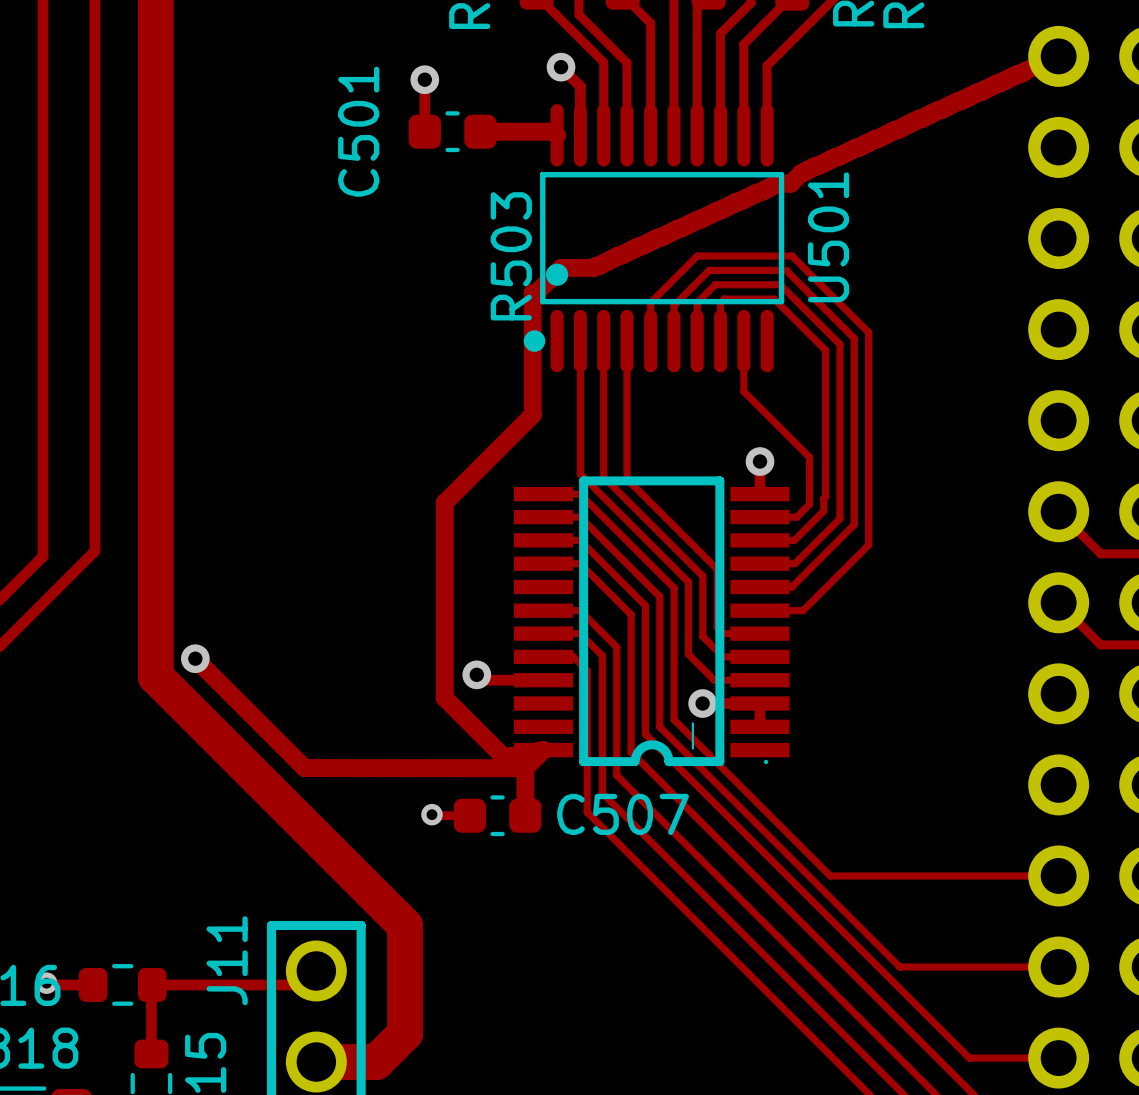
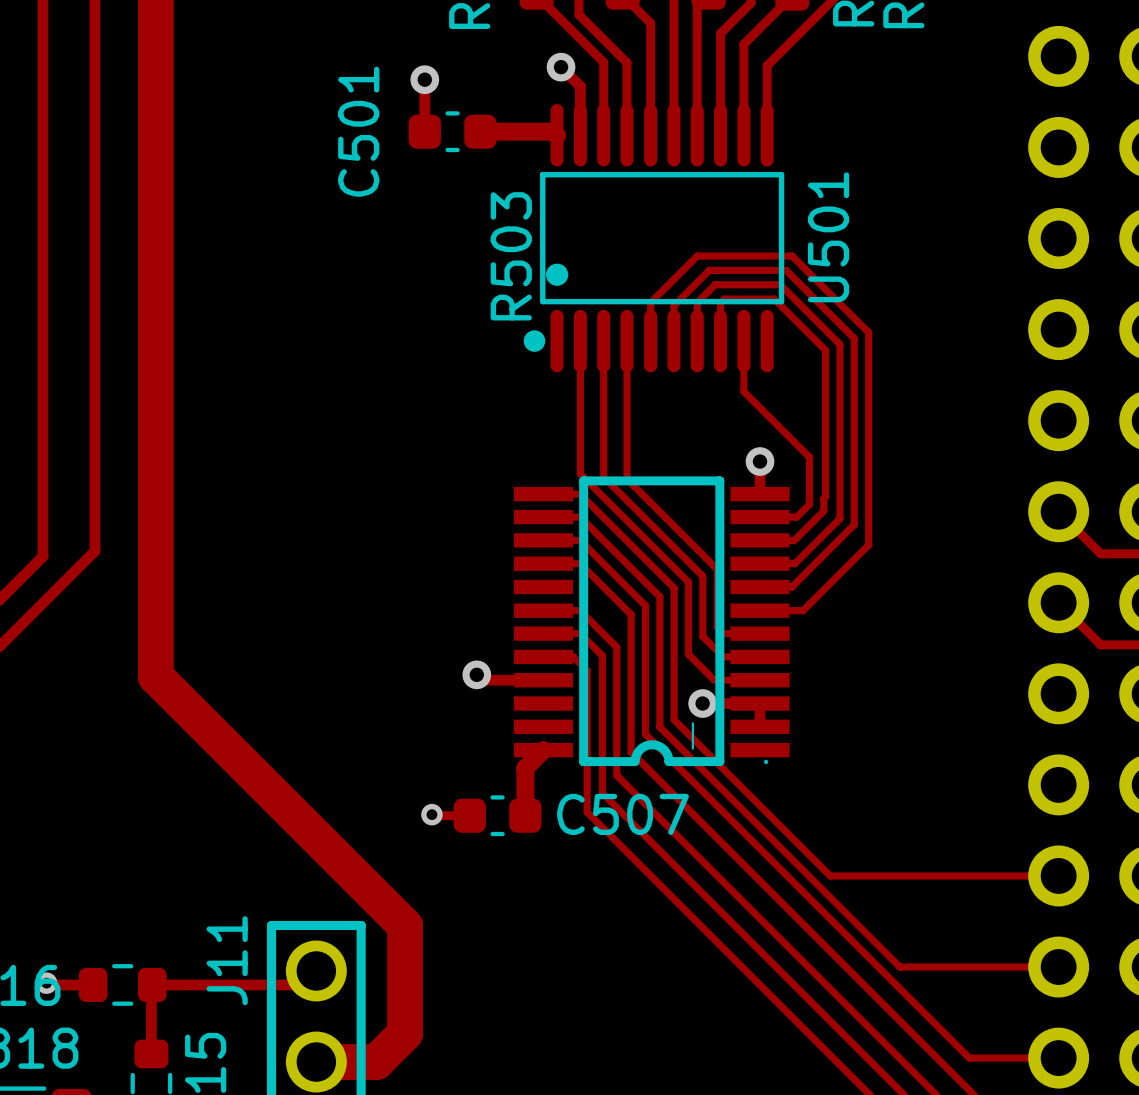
track: (1058, 56) (815, 165) (801, 172) (790, 183) (776, 183) (599, 266) (593, 267) (561, 267) (536, 293) (532, 293) (532, 414) (444, 502) (444, 698) (504, 757) (543, 750) -> none
track: (195, 658) (304, 768) (525, 768) -> none
via: (195, 658) -> none

